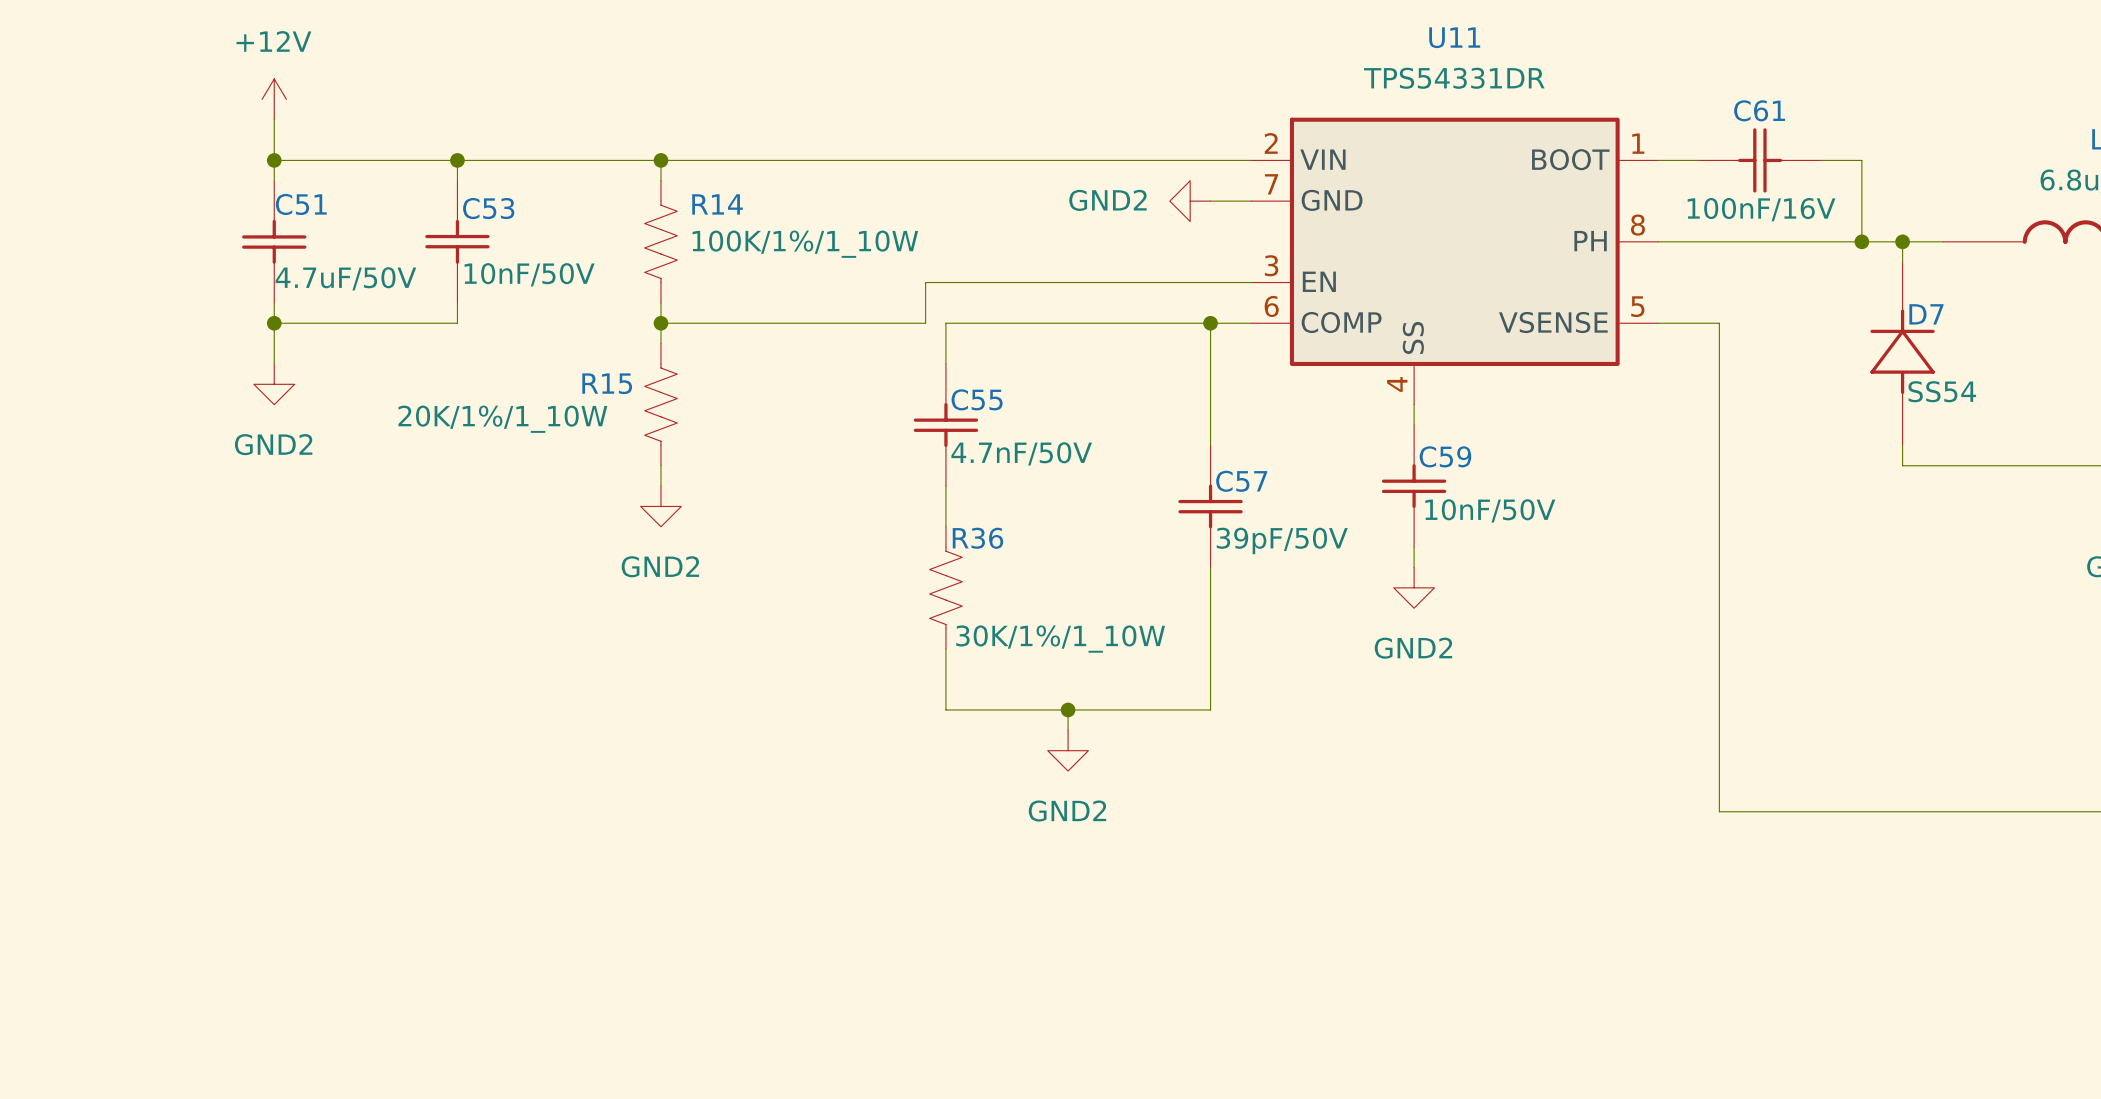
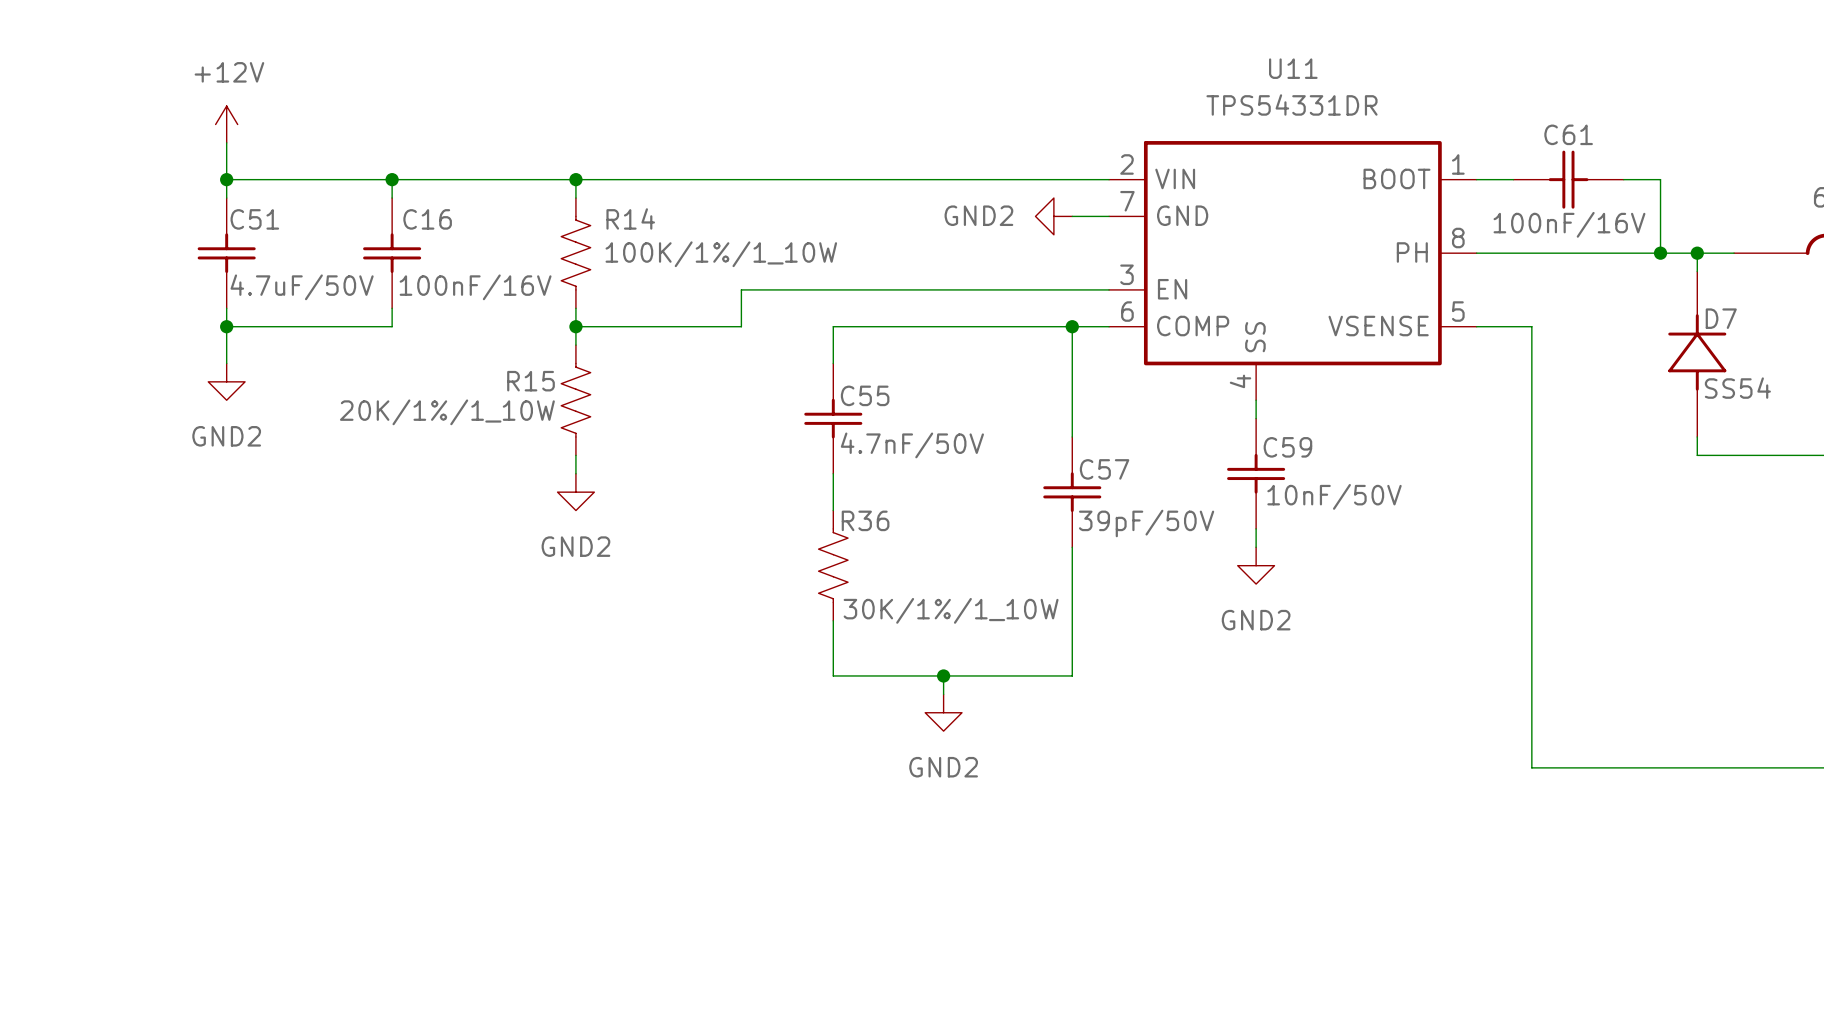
C53 name: C53 (488, 208) -> C16 (427, 219)
C53 value: 10nF/50V (529, 274) -> 100nF/16V (475, 287)
wire: (925, 282) (925, 323) (844, 323) -> (814, 289) (741, 289) (741, 326)

